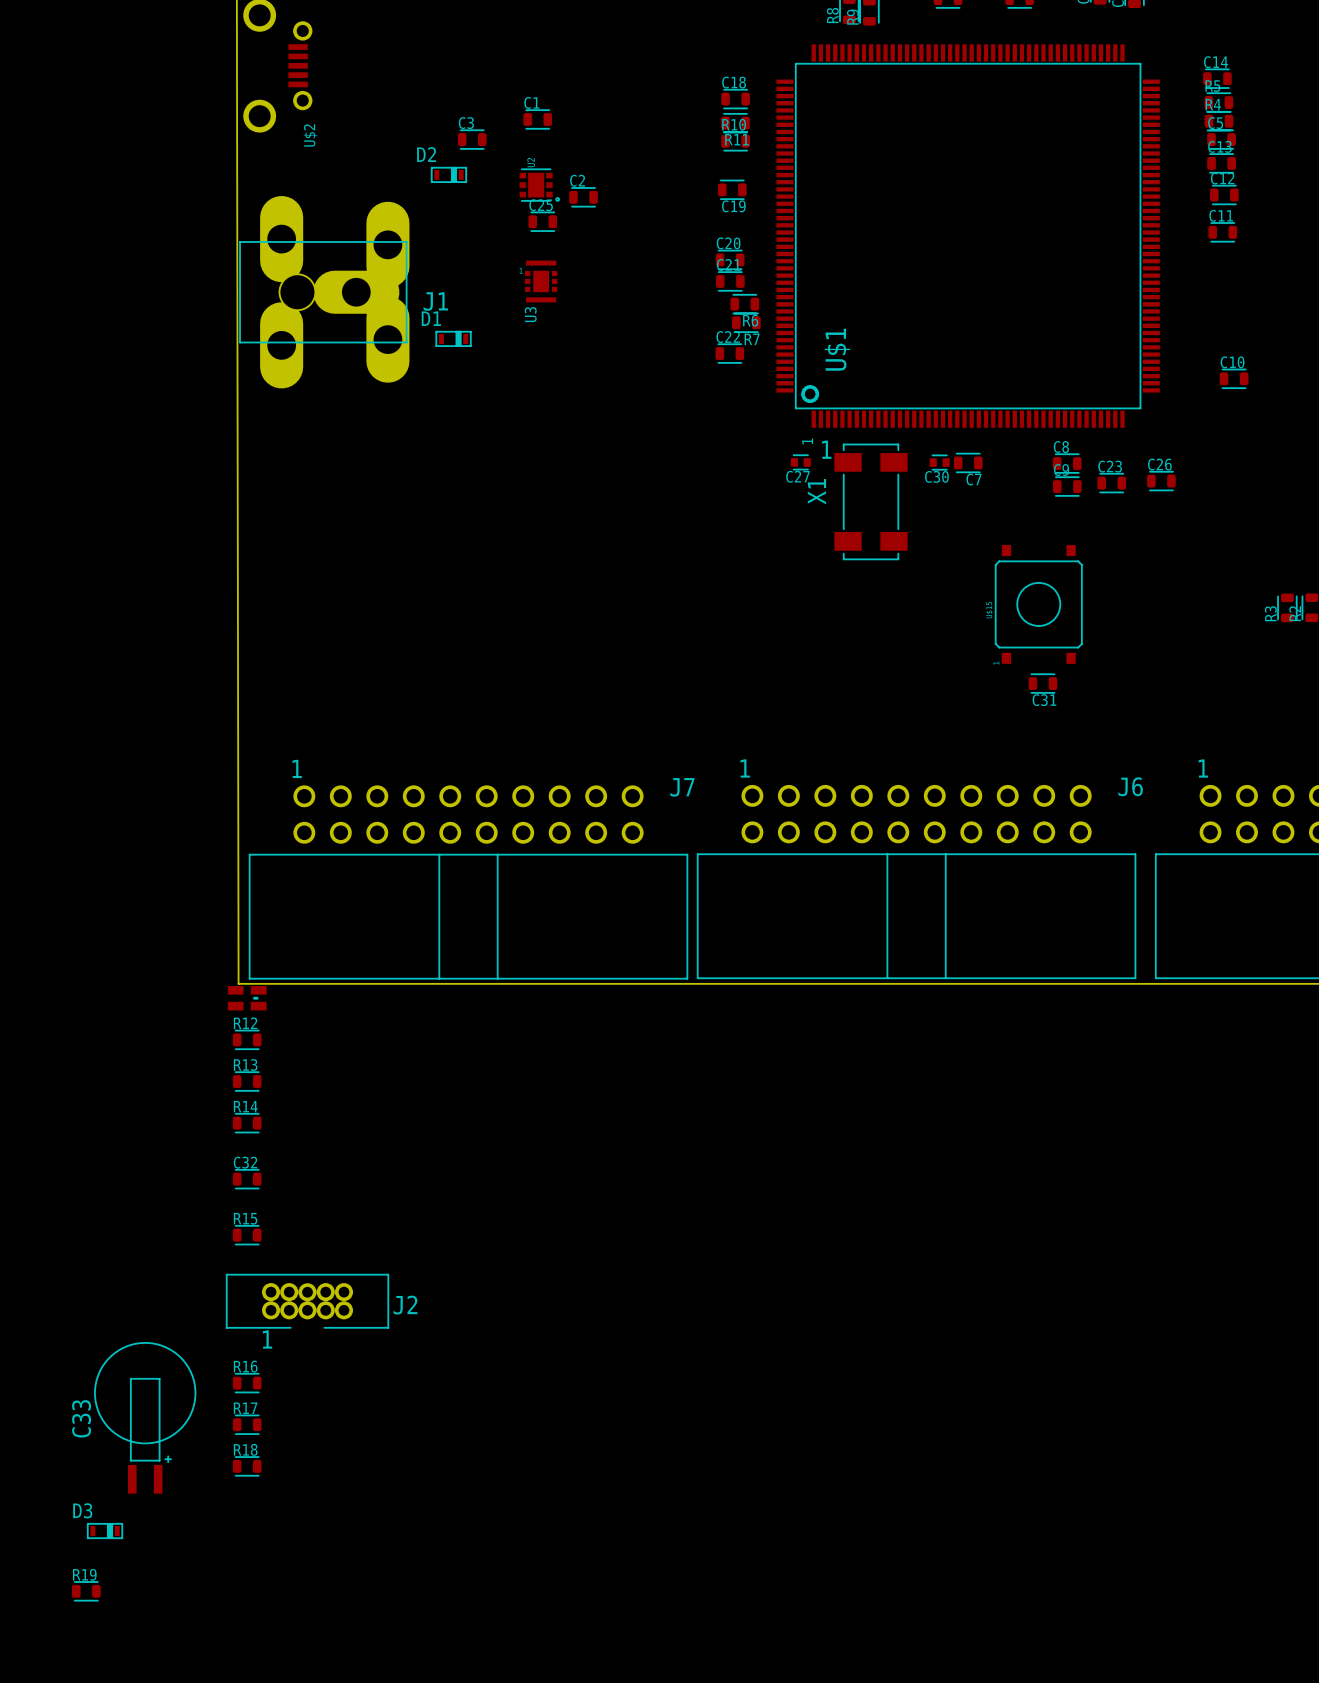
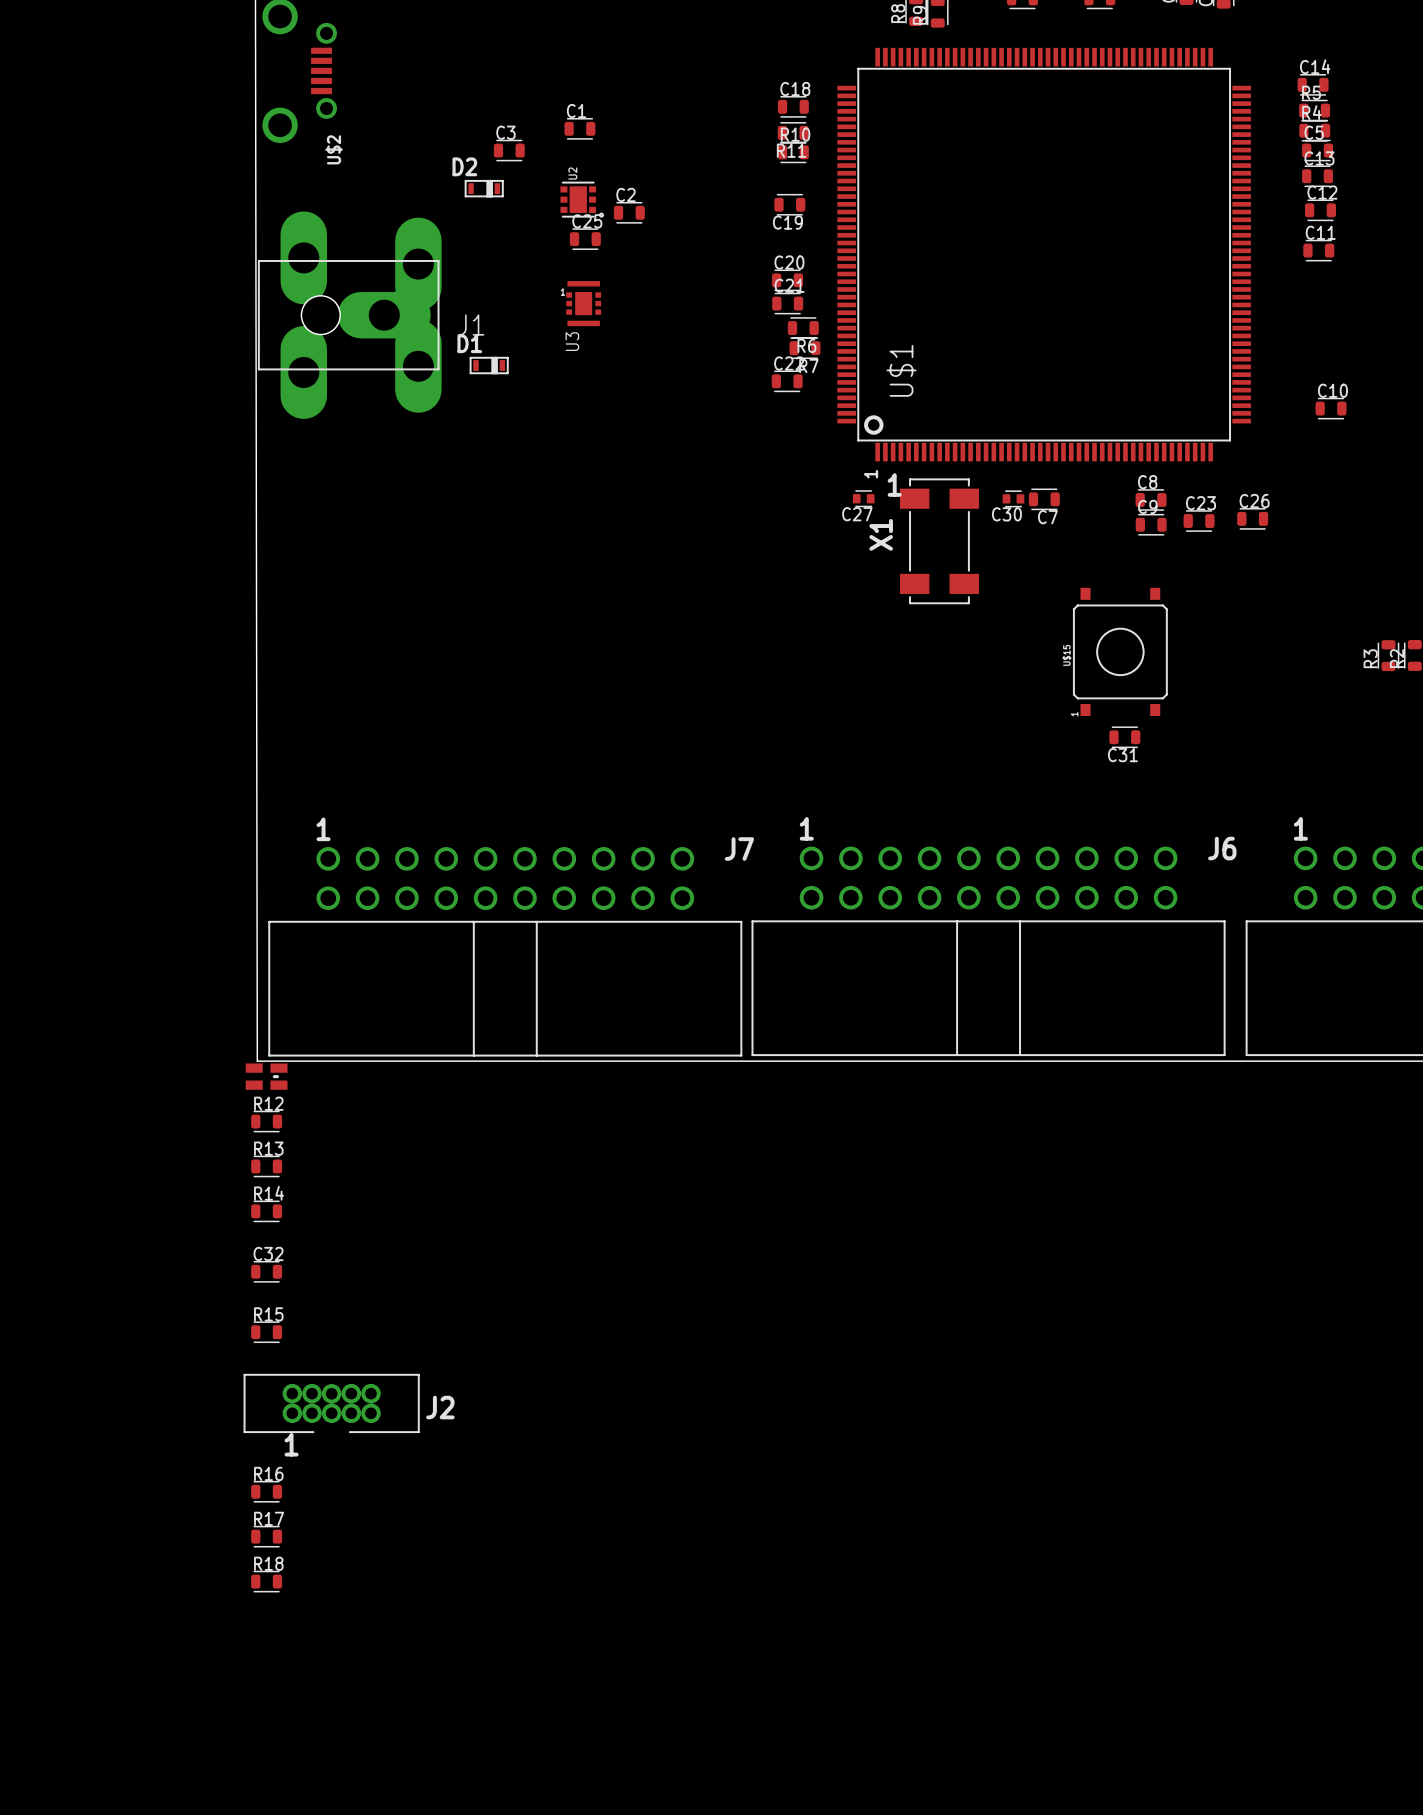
C33: (145, 1417) -> none
D3: (105, 1531) -> none
R19: (86, 1591) -> none

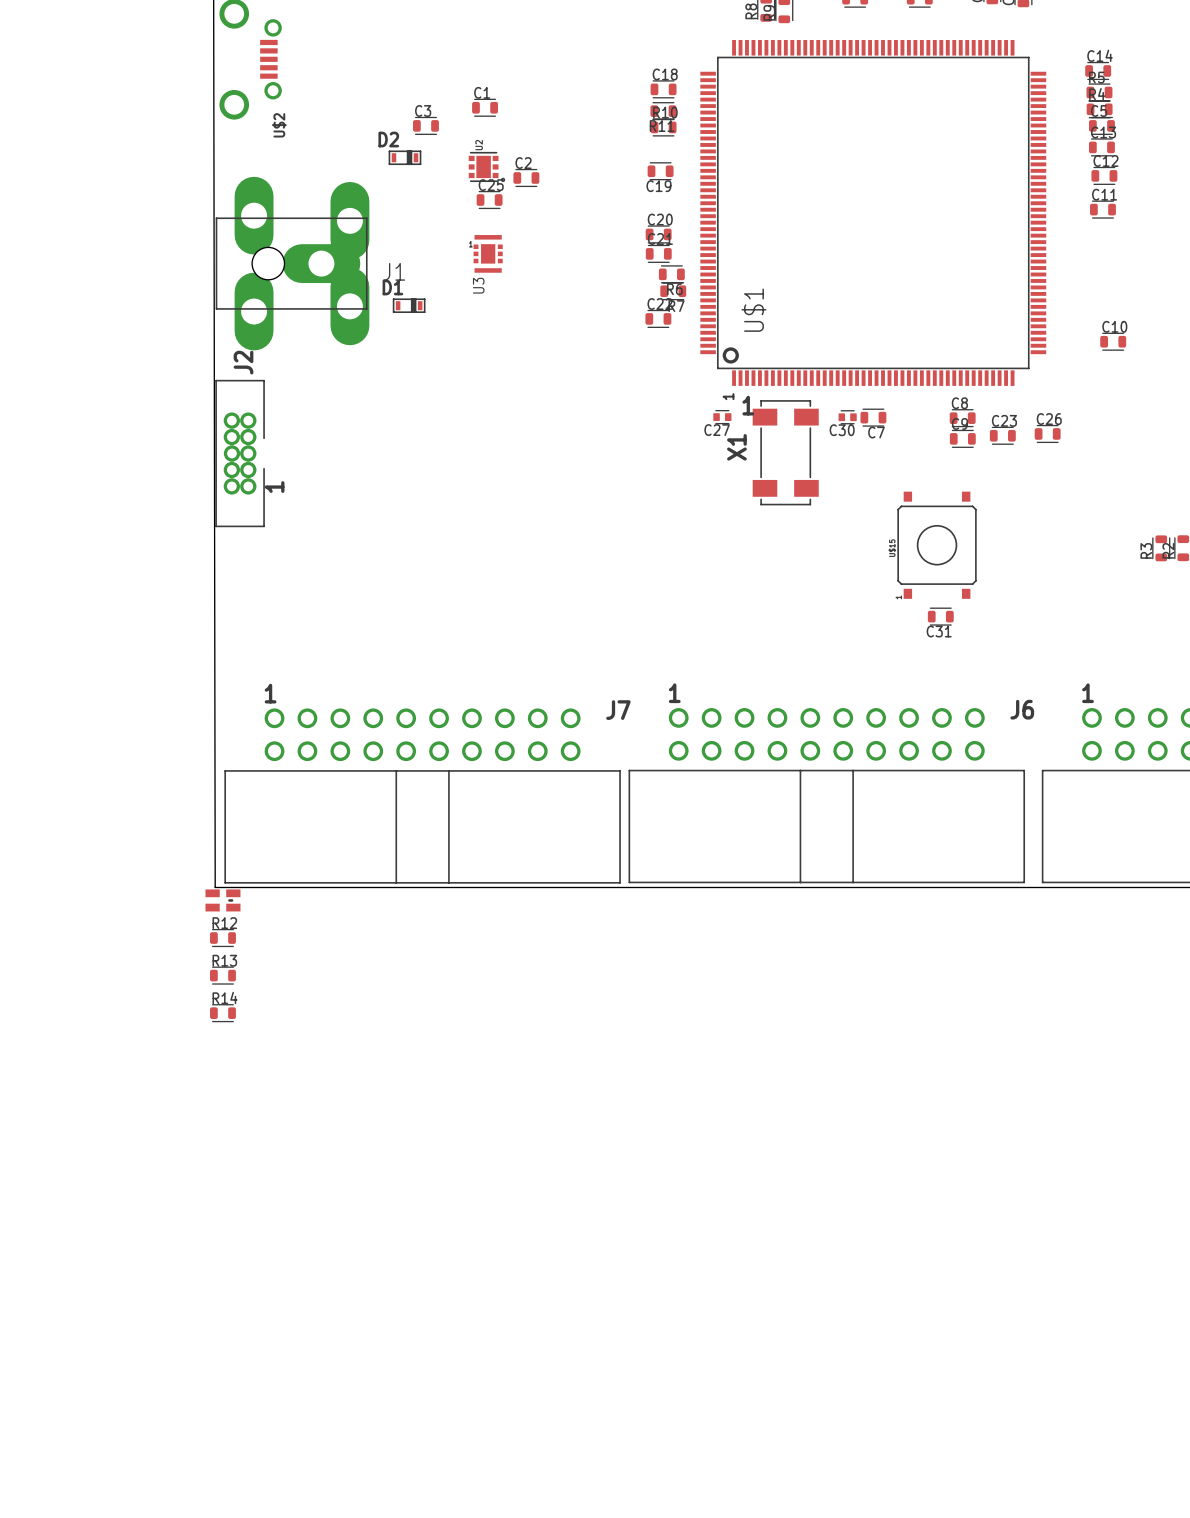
C32: (266, 1271) -> none
R15: (266, 1332) -> none
J2 rotation: 0° (331, 1403) -> 90° counterclockwise (240, 453)
J2 position: (331, 1403) -> (240, 453)
R16: (266, 1491) -> none
R17: (266, 1536) -> none
R18: (266, 1581) -> none

